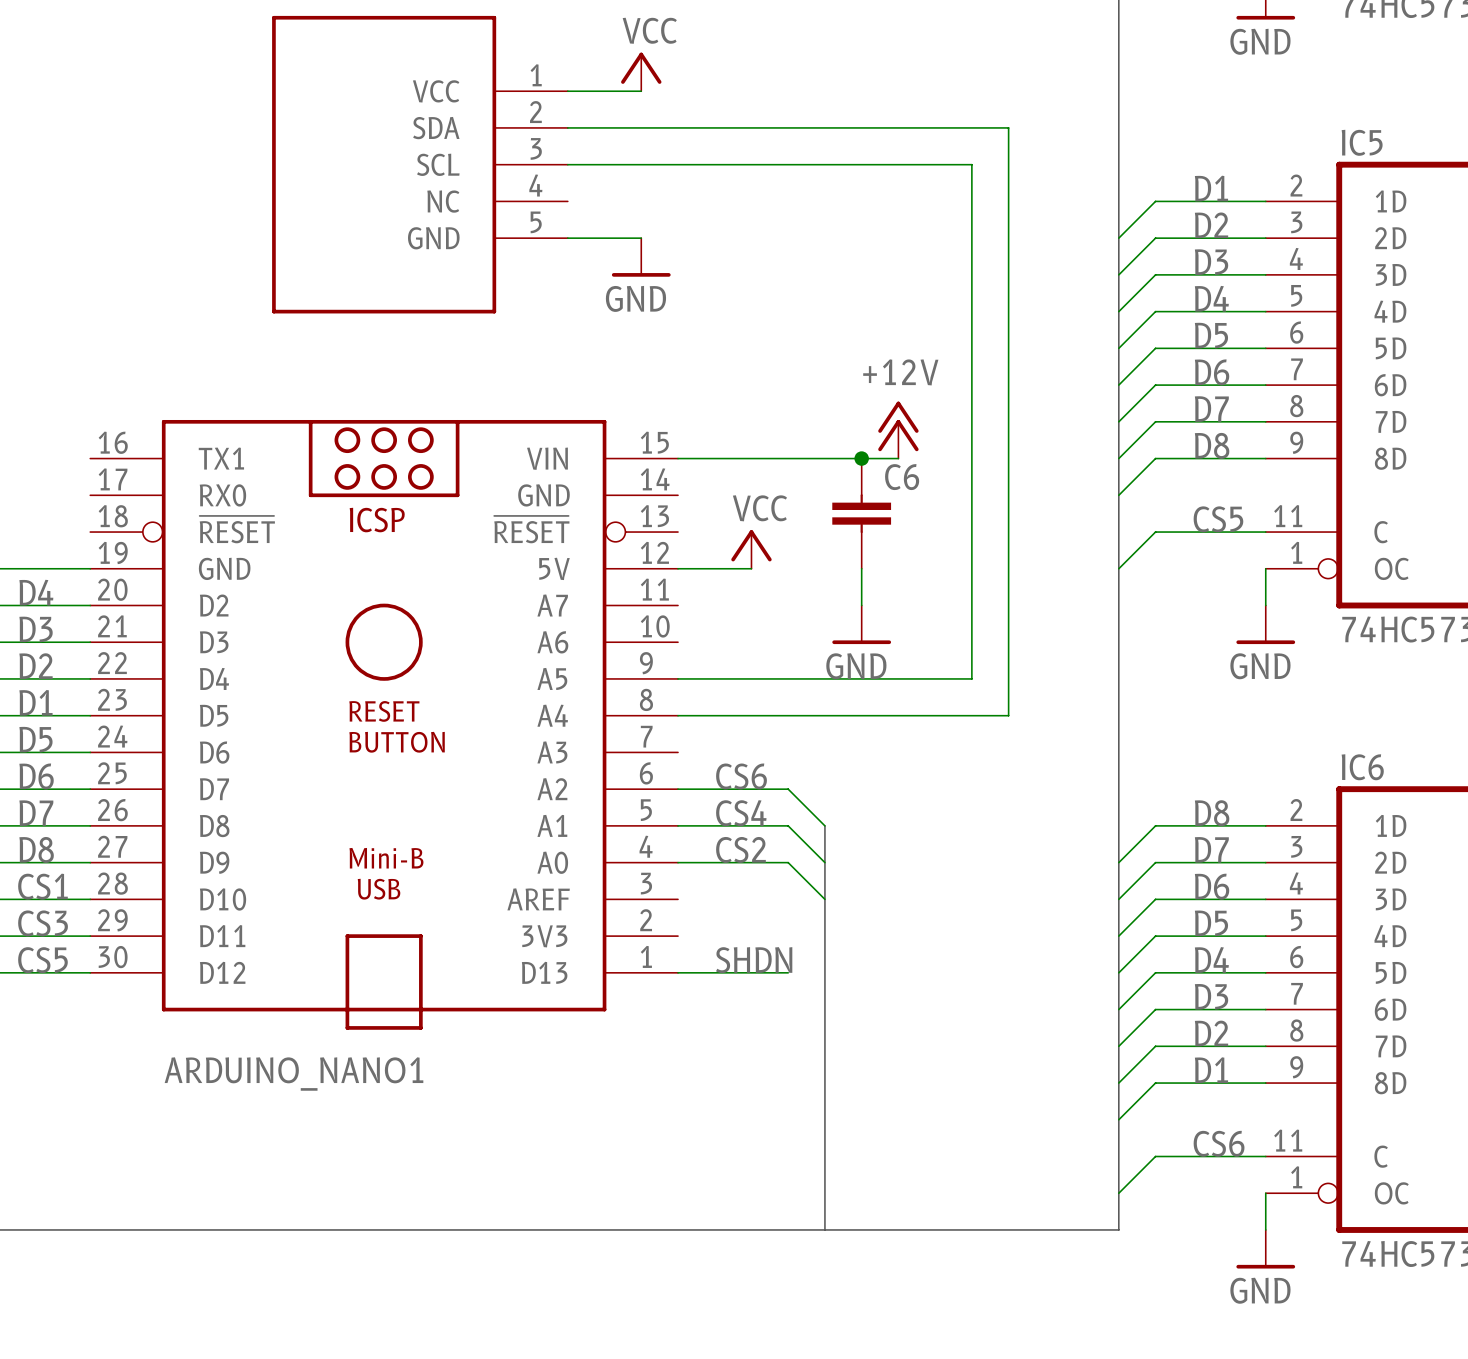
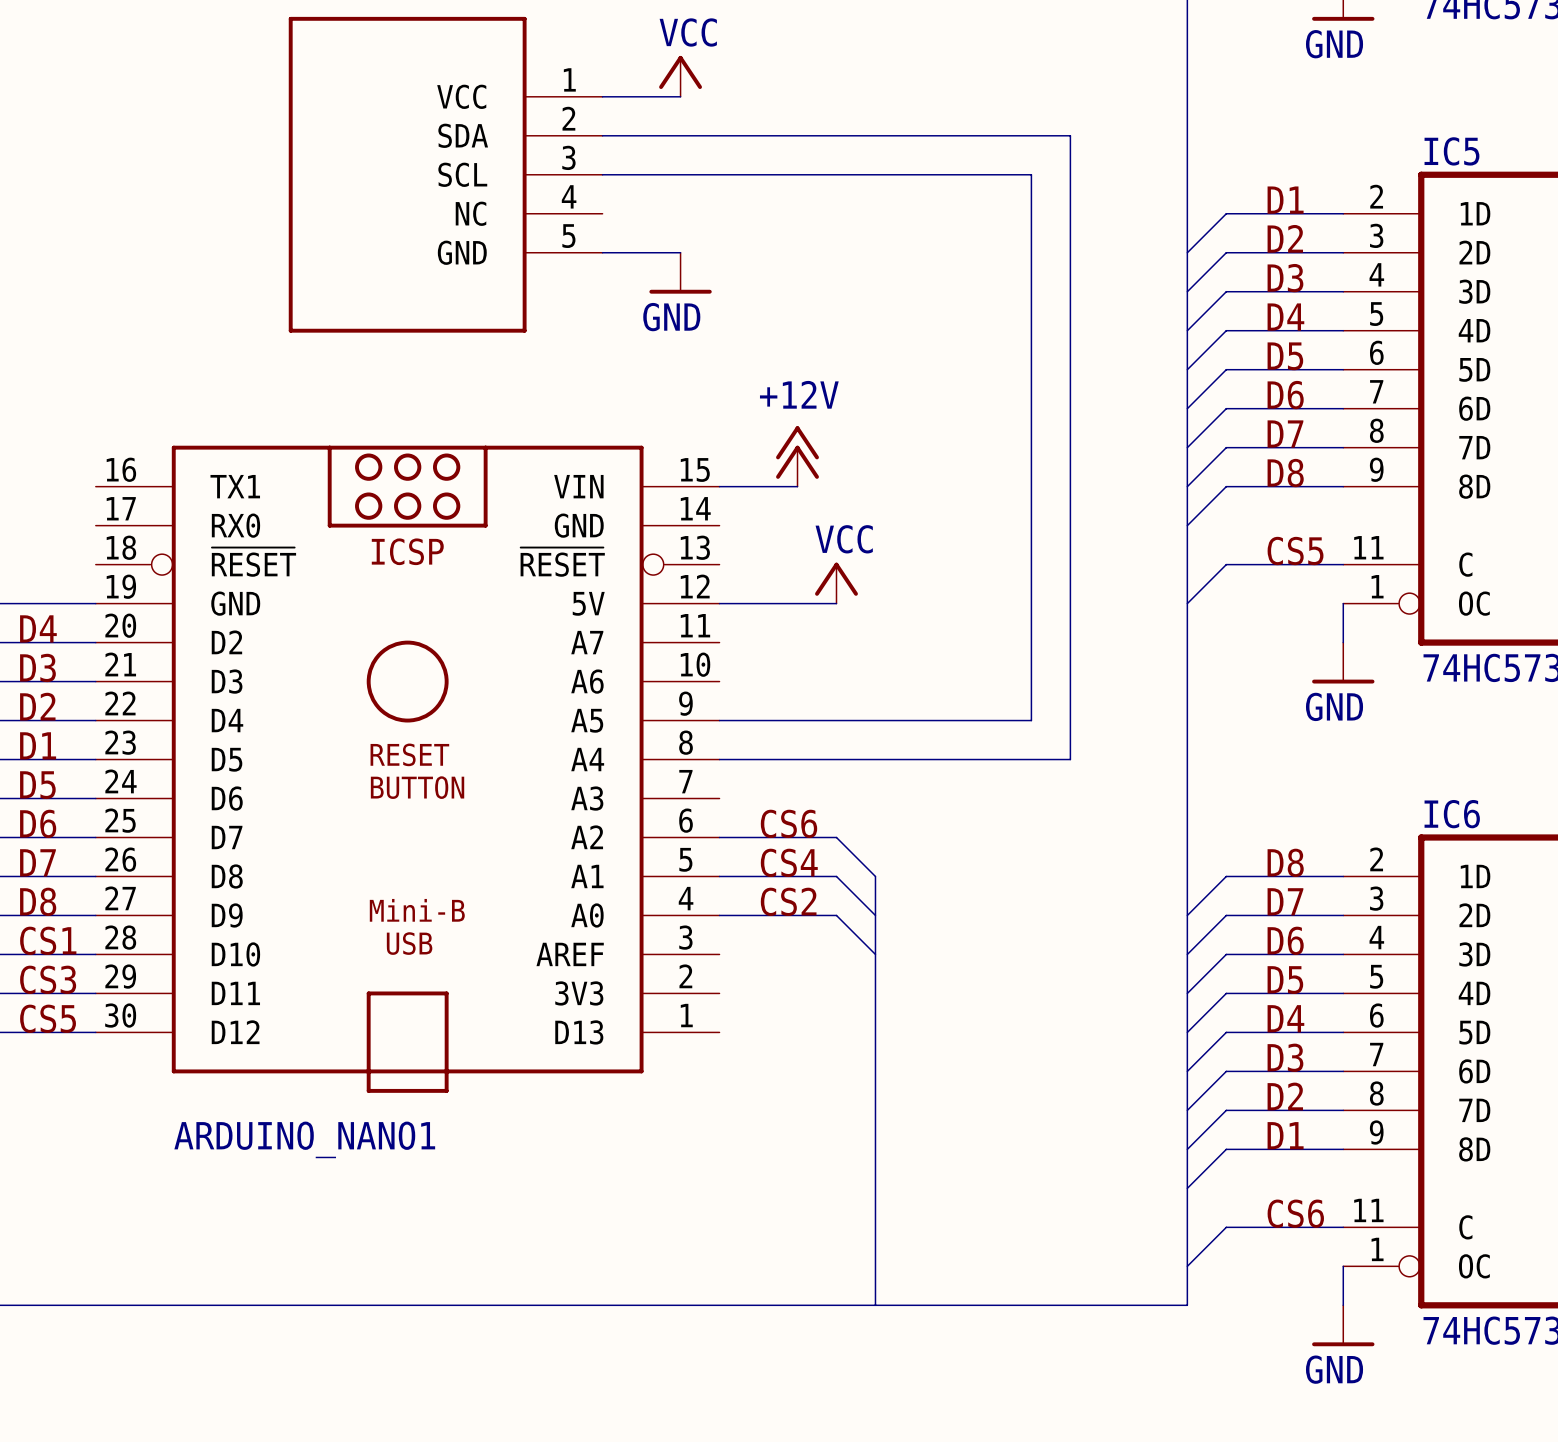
power symbol position: +12V (898, 430) -> +12V (797, 456)
wire: (751, 458) (898, 458) -> none
junction: (861, 458) -> none
C6: (861, 513) -> none
power symbol position: VCC (751, 549) -> VCC (836, 583)
wire: none -> (797, 603) (836, 603)
wire: (861, 568) (861, 605) -> none
power symbol: GND (861, 624) -> none
label: SHDN (754, 960) -> none
wire: (678, 972) (788, 972) -> none

